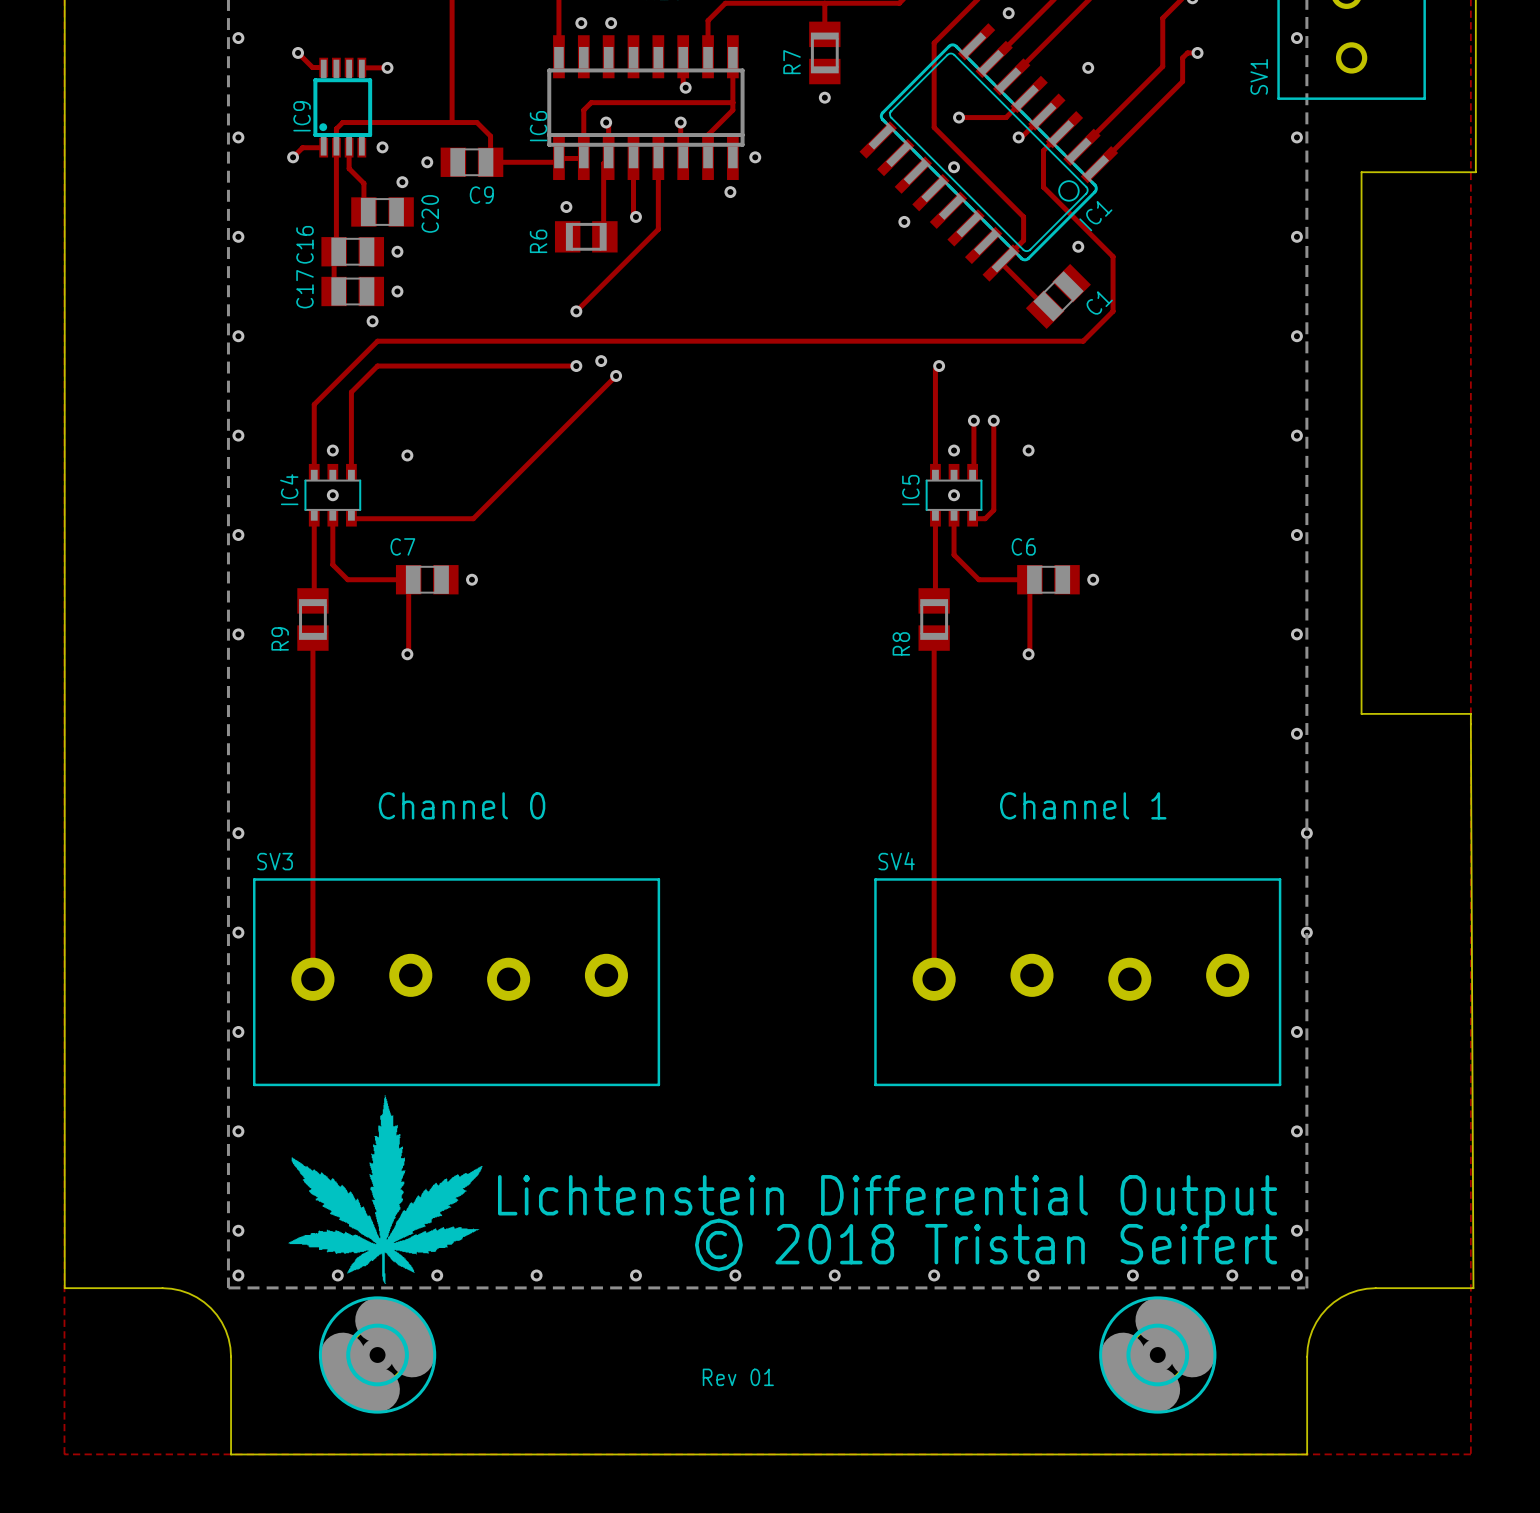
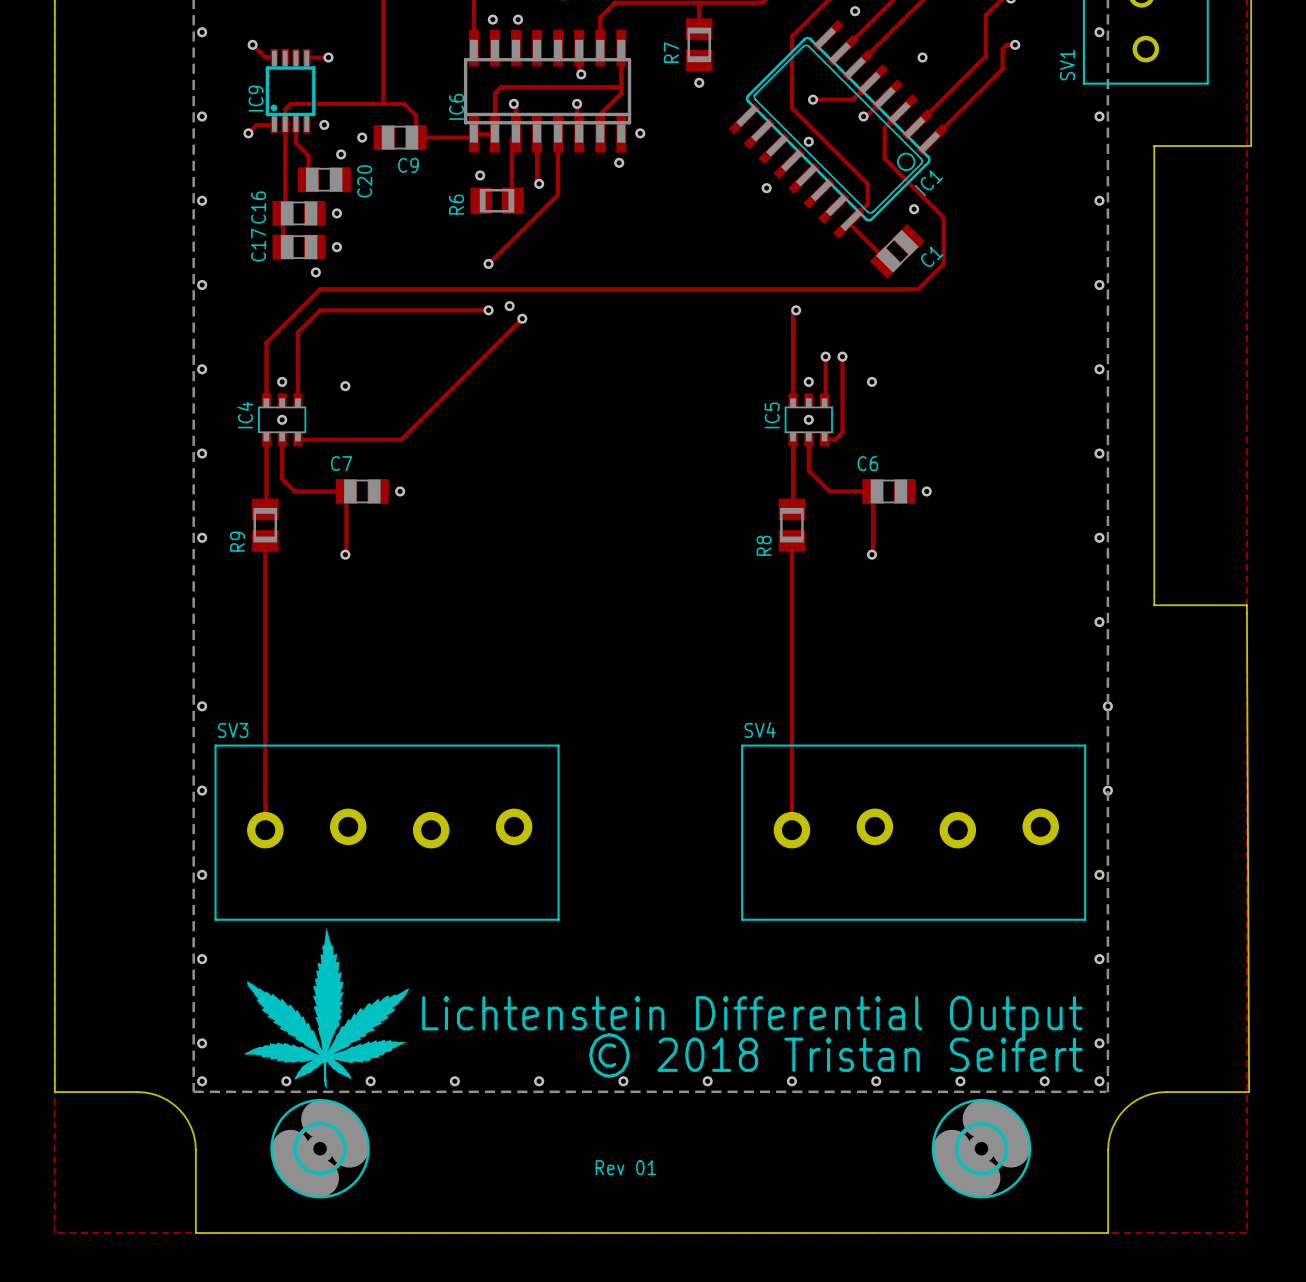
text: Channel 0 (462, 805) -> none
text: Channel 1 (1083, 805) -> none

